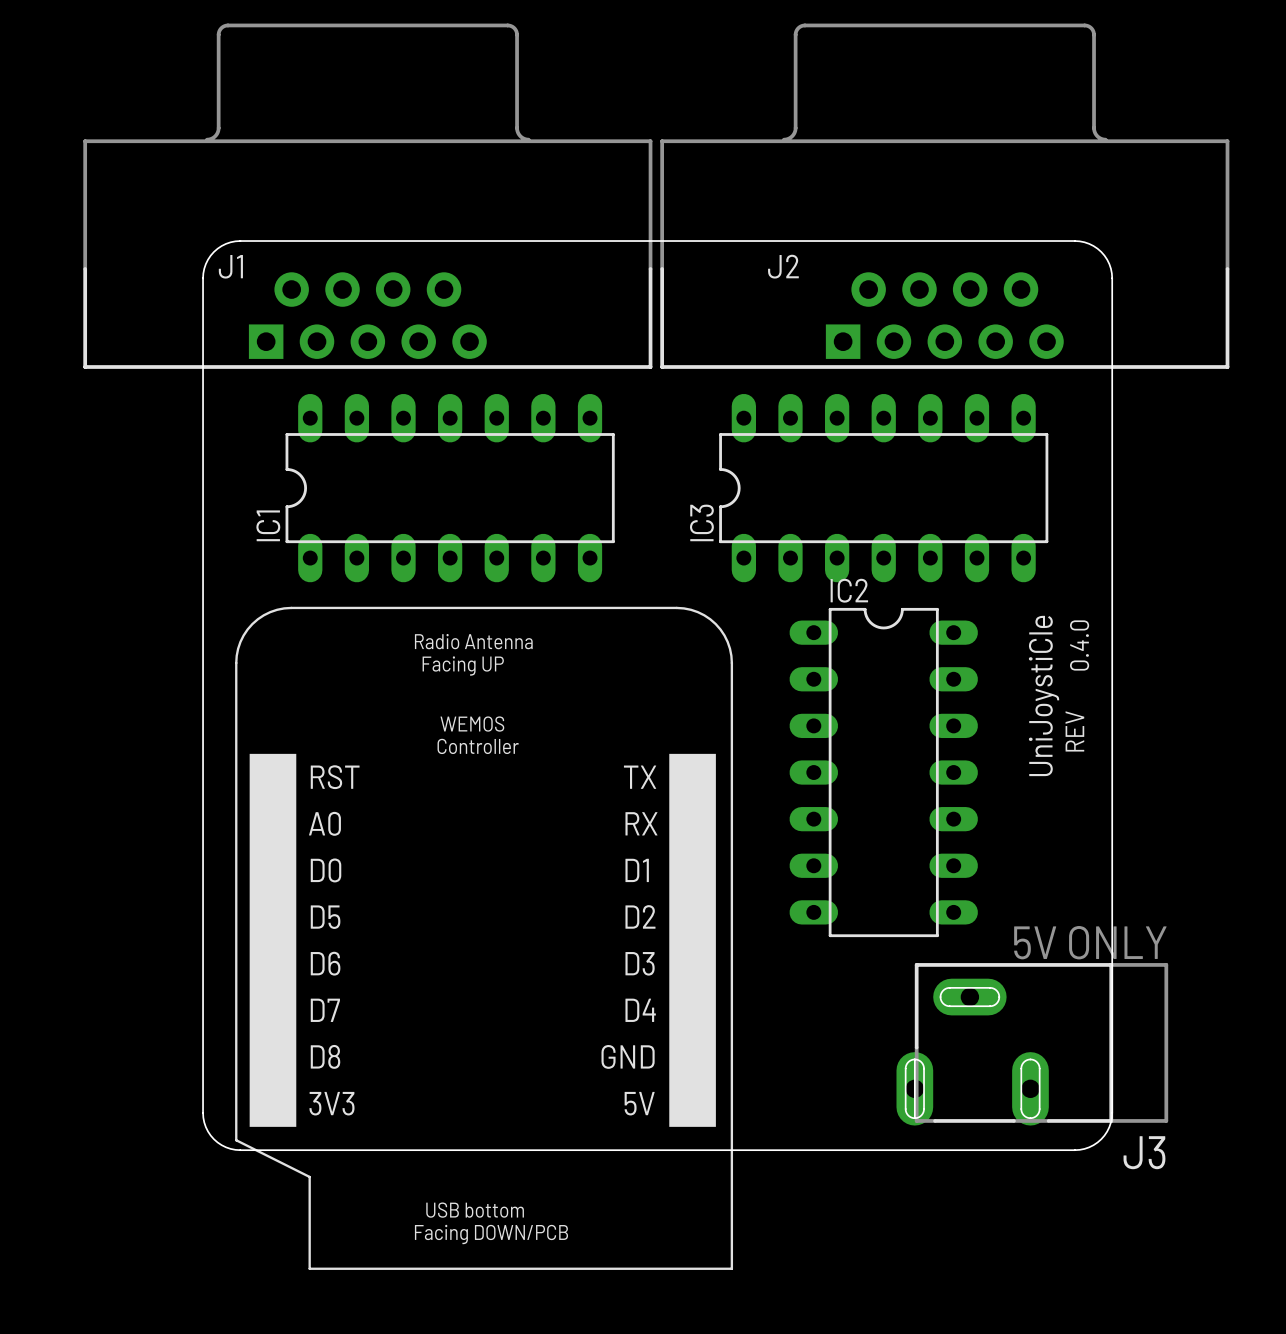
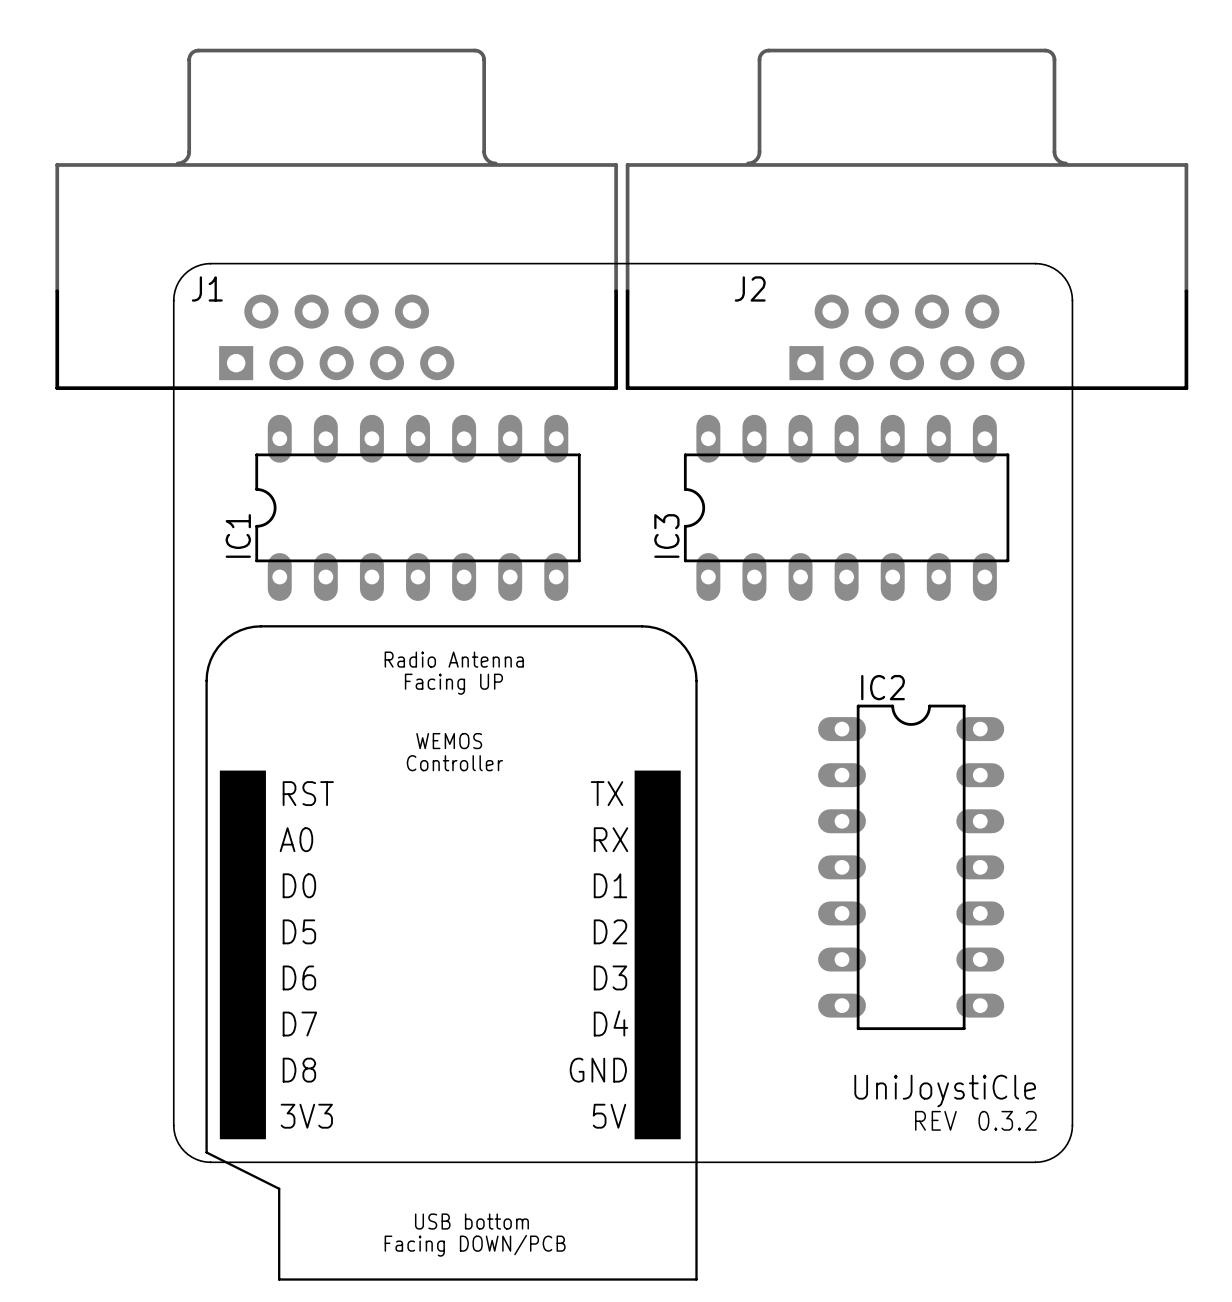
text: 0.4.0 (1079, 645) -> none
text: UniJoystiCle (1044, 695) -> none
text rotation: 0° (1074, 731) -> 90° clockwise (935, 1120)
text position: REV (1074, 731) -> REV (935, 1120)
IC2 position: (883, 772) -> (911, 867)
J3: 5V ONLY (1032, 1044) -> none
text: none -> UniJoystiCle (945, 1091)
text: none -> 0.3.2 (1007, 1120)

